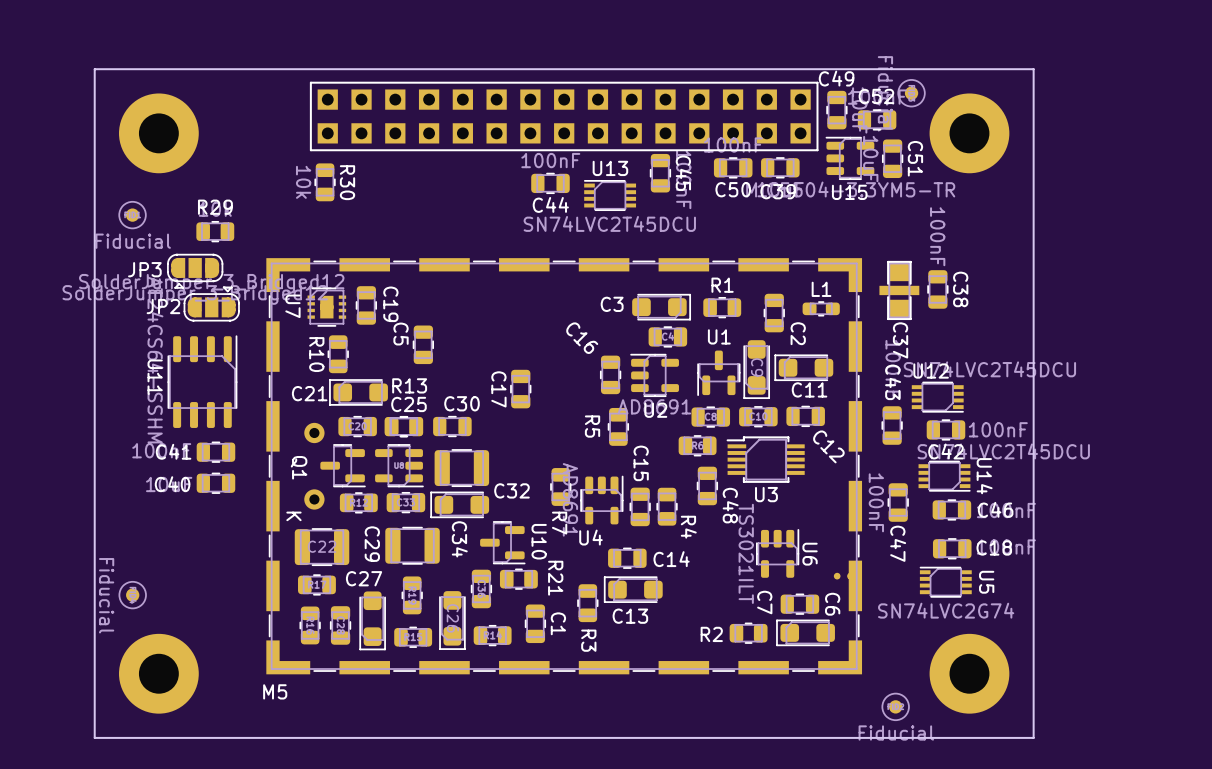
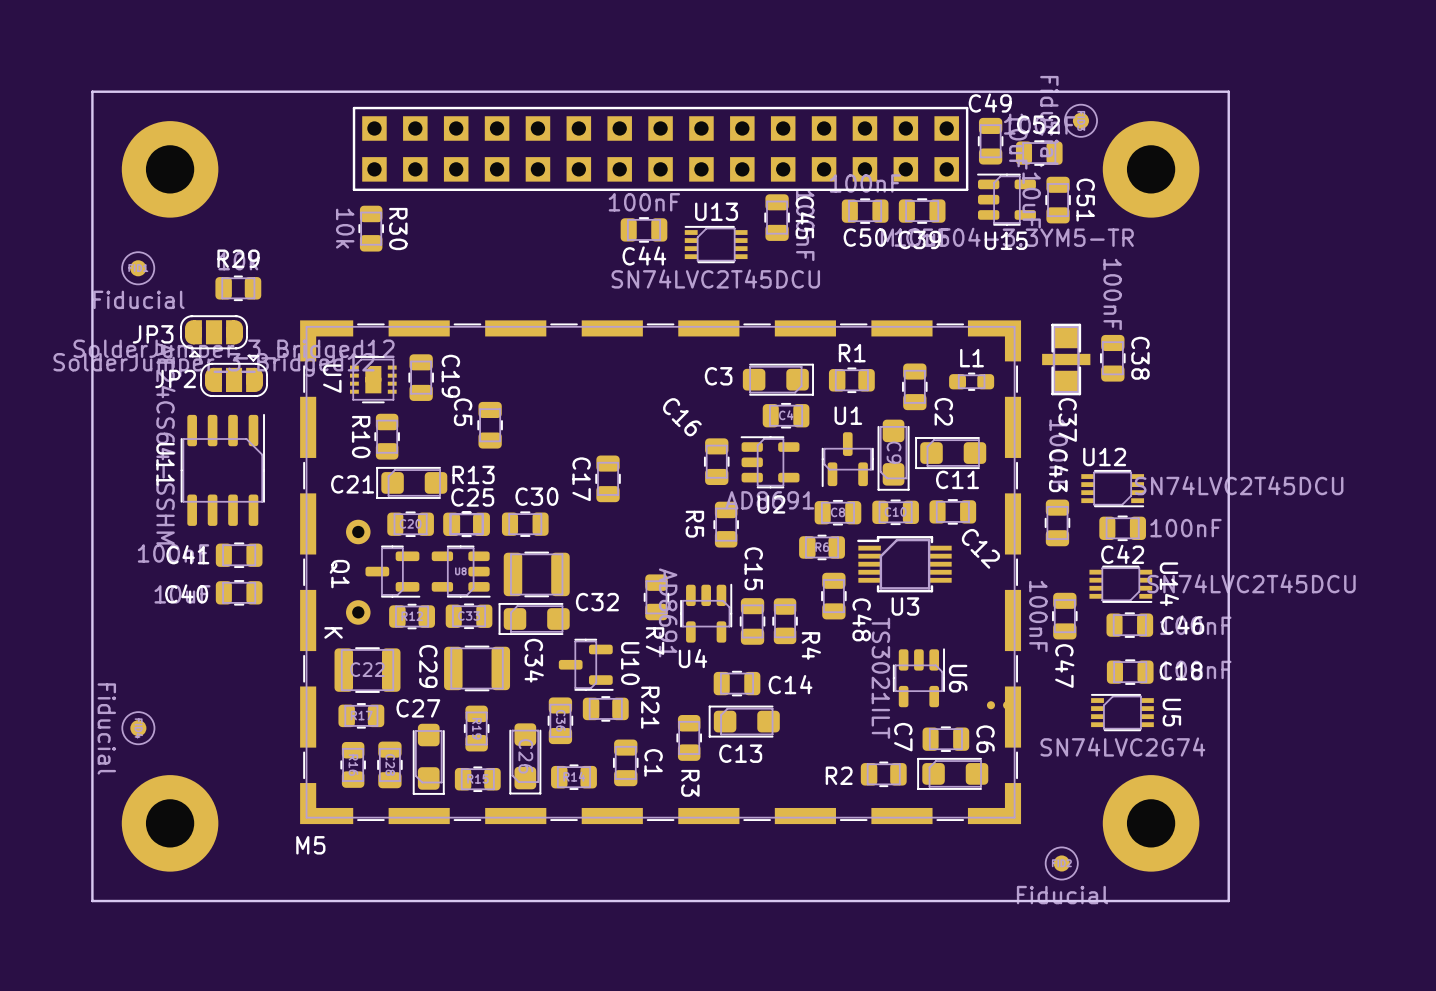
U12 value position: SN74LVC2T45DCU (989, 369) -> SN74LVC2T45DCU (1239, 485)
U14 value position: SN74LVC2T45DCU (1003, 451) -> SN74LVC2T45DCU (1251, 583)

